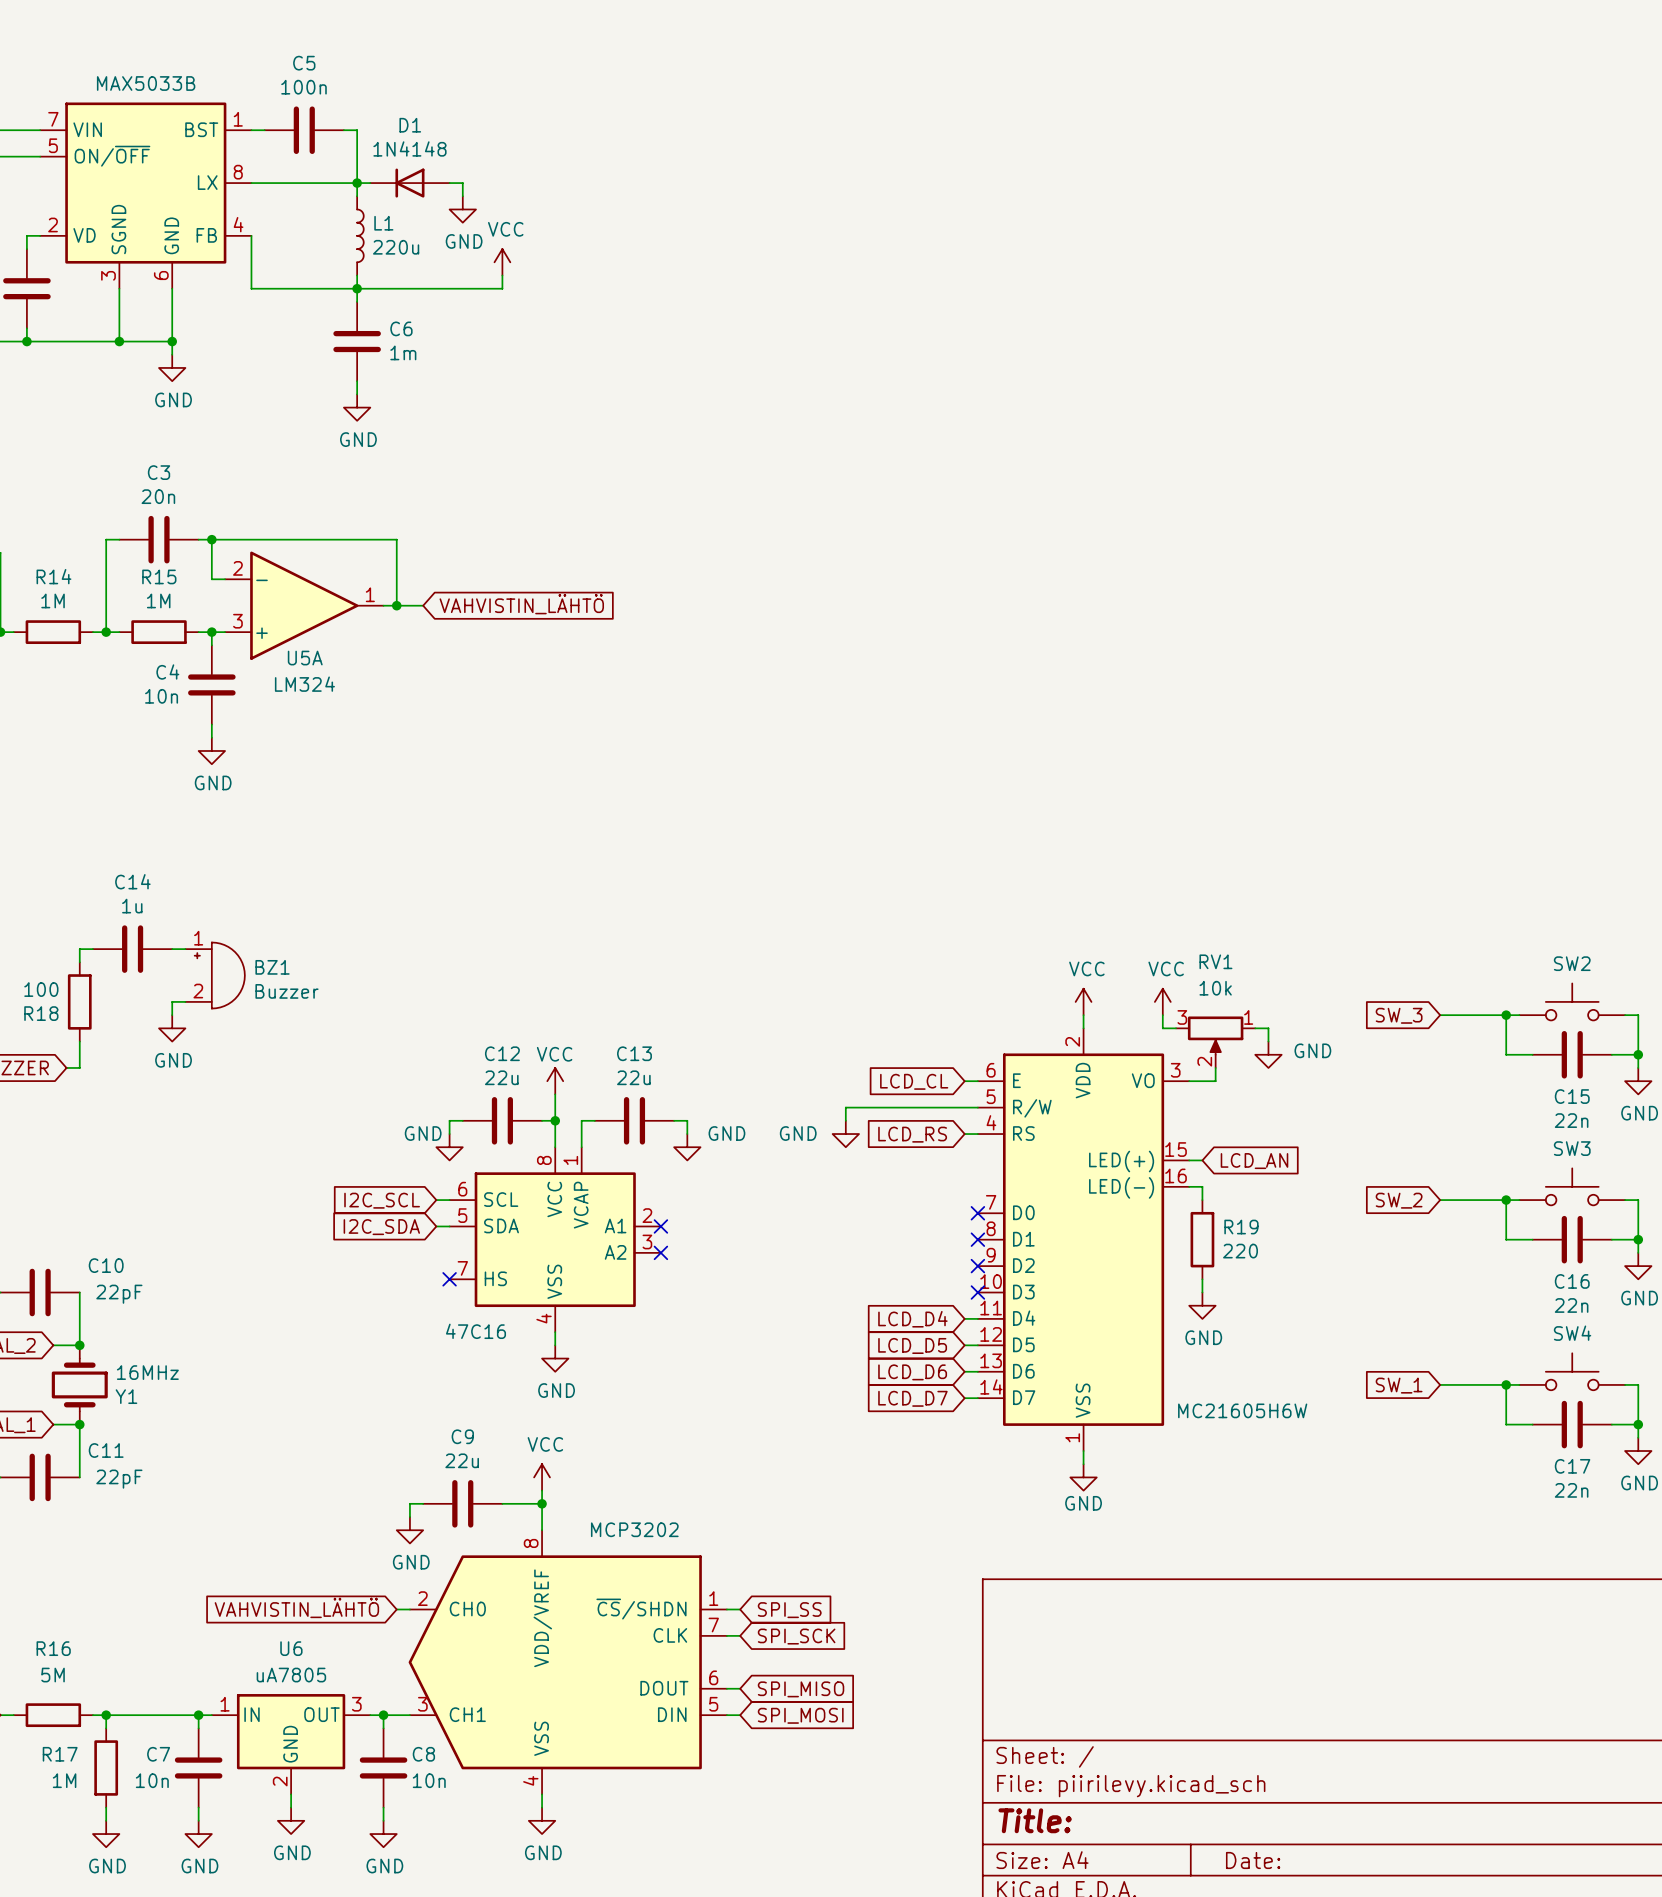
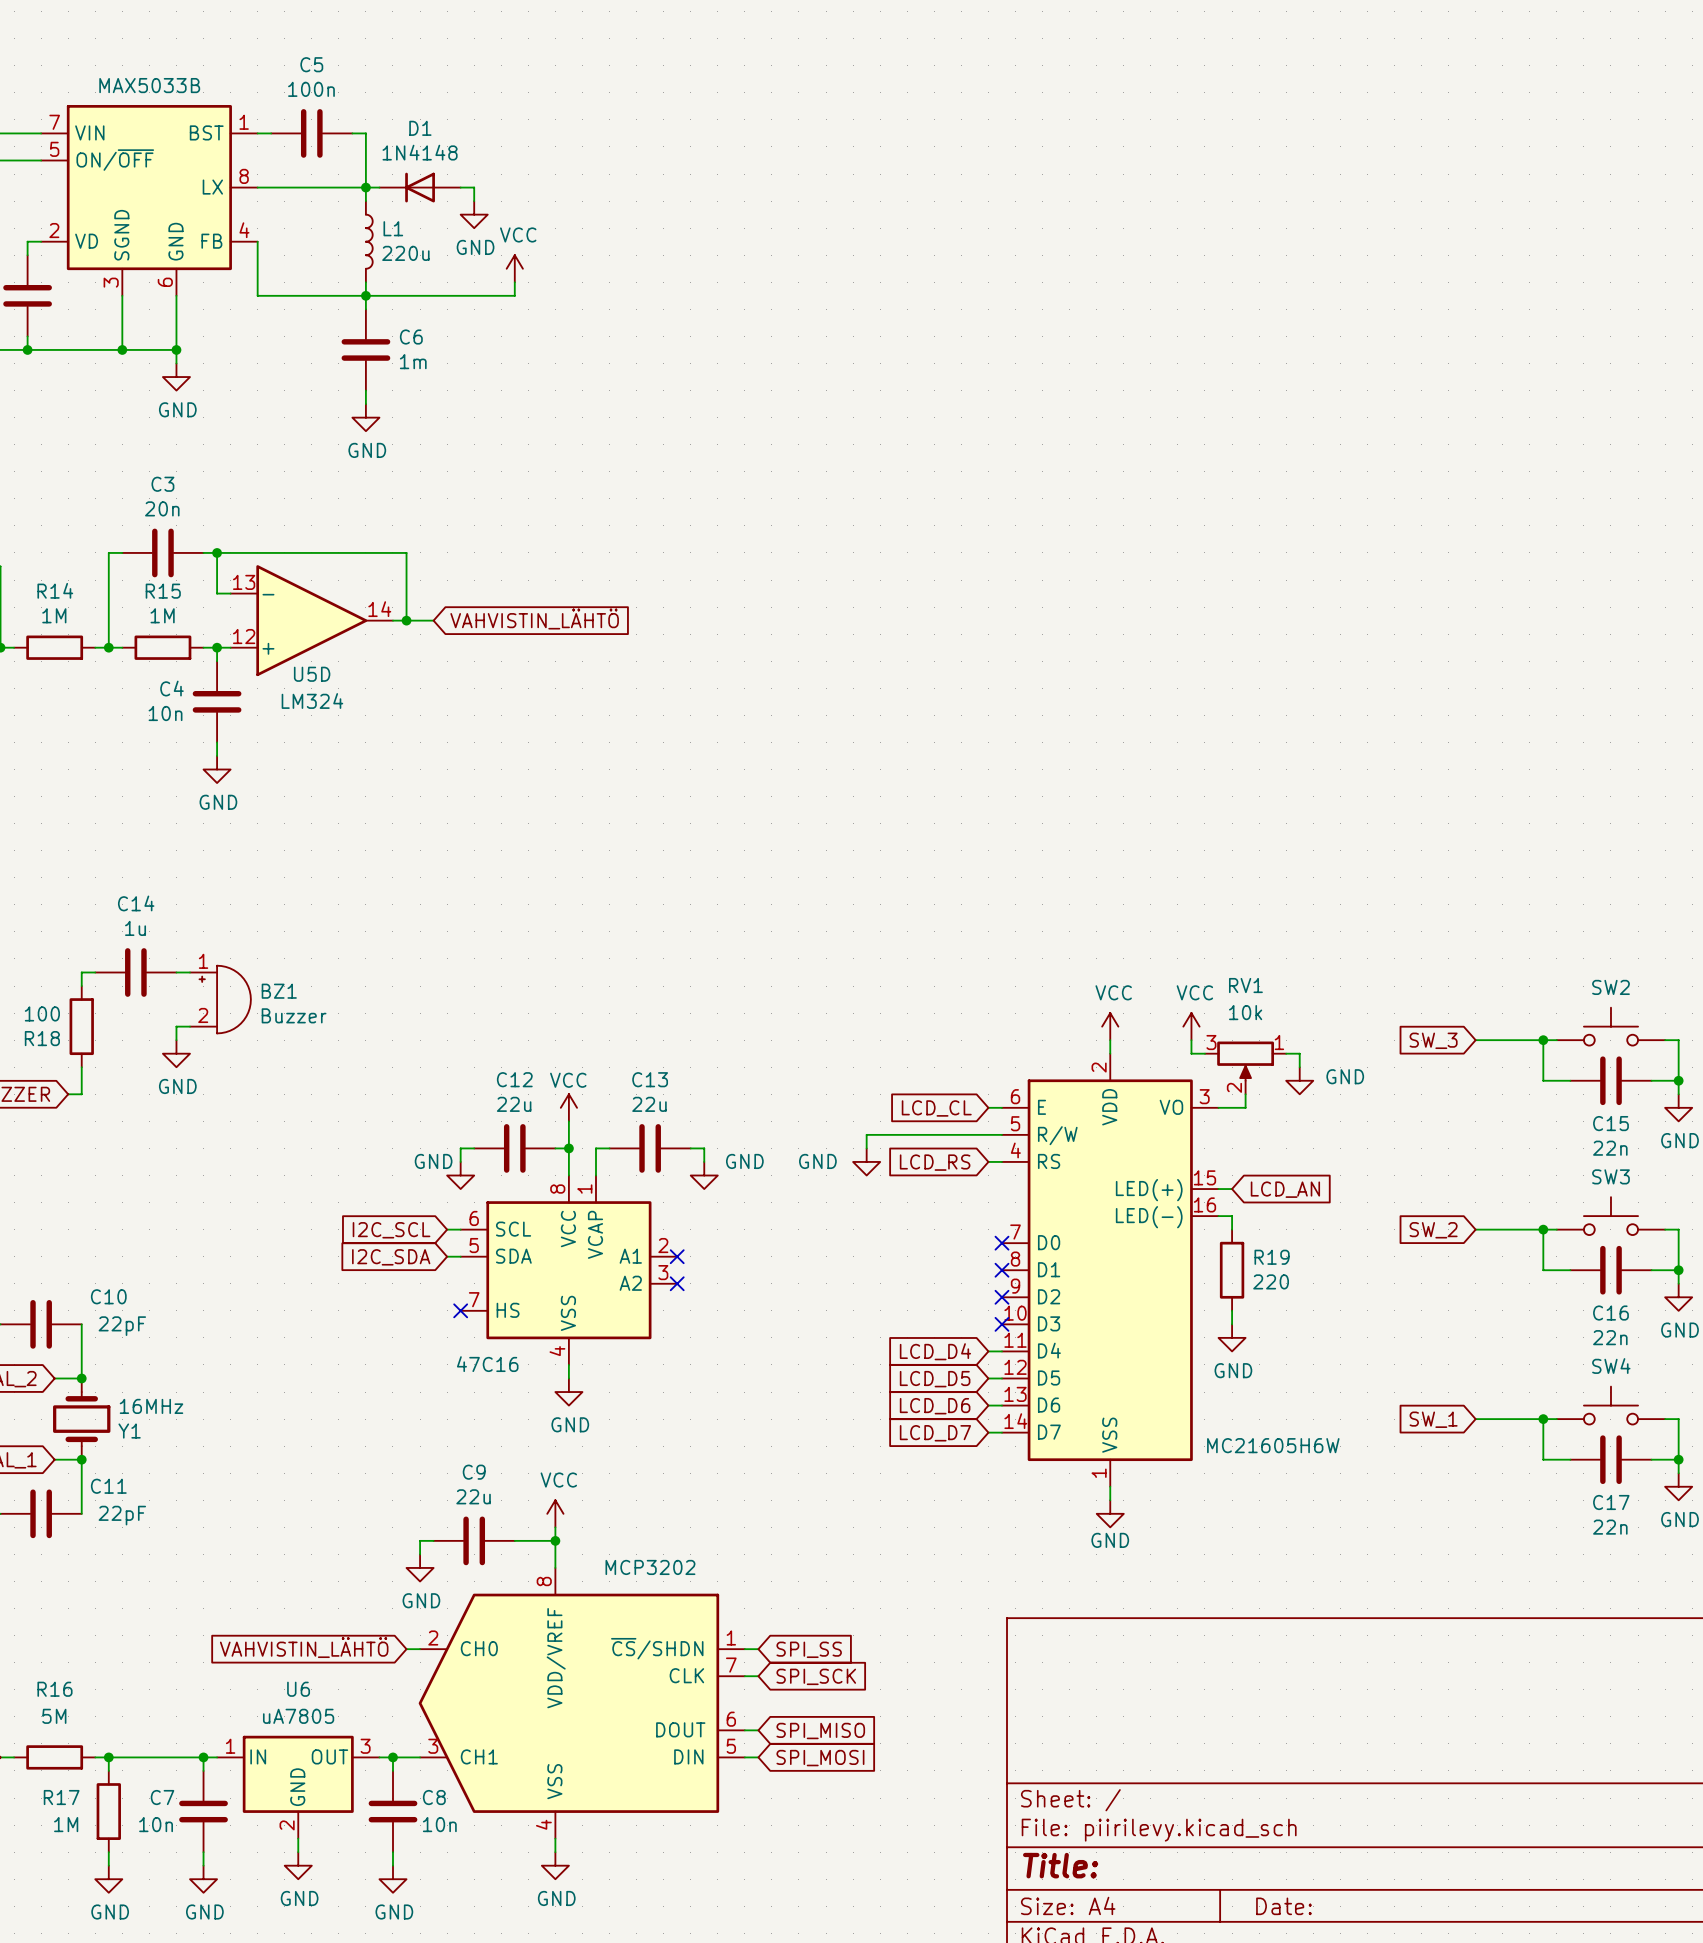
U5A pin number: 2 (237, 568) -> 13 (244, 582)
U5A pin number: 1 (370, 594) -> 14 (379, 609)
U5A pin number: 3 (237, 621) -> 12 (244, 636)
U5A name: U5A (305, 658) -> U5D (312, 674)

